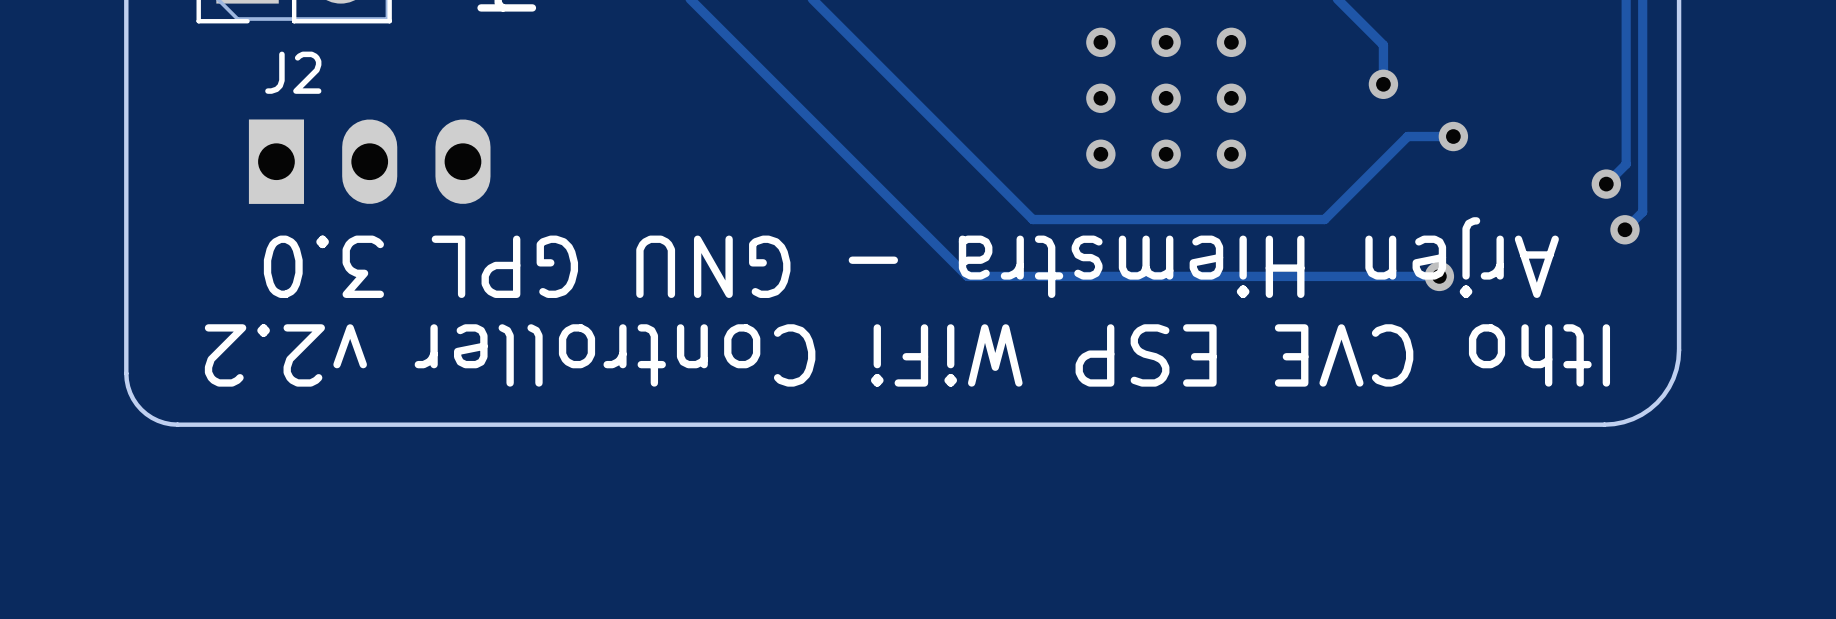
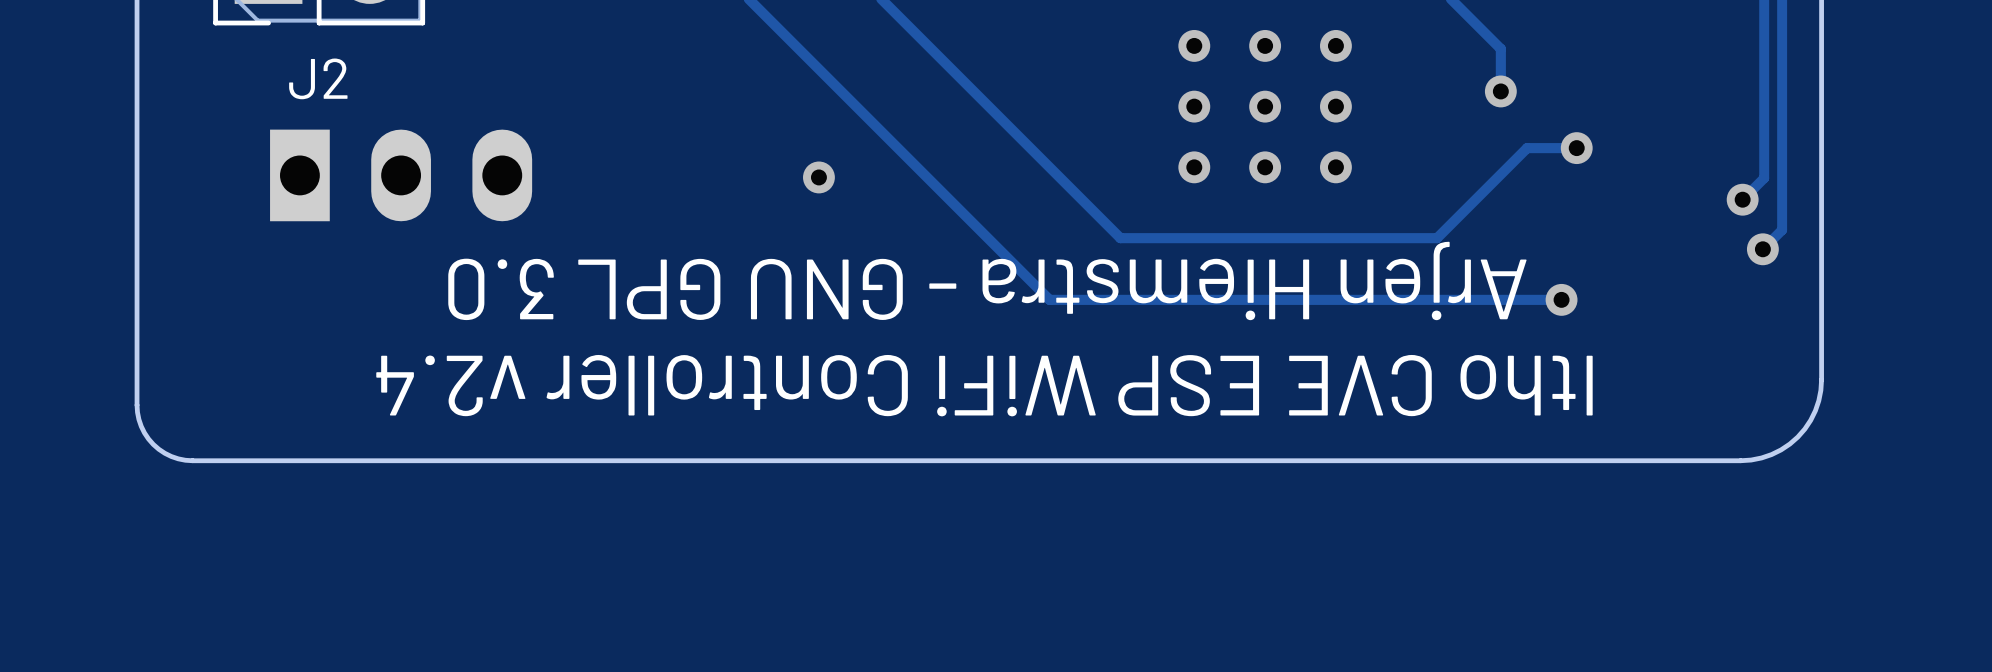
via: none -> (818, 177)
text: Itho CVE ESP WiFi Controller v2.2 (907, 355) -> Itho CVE ESP WiFi Controller v2.4 (984, 385)

